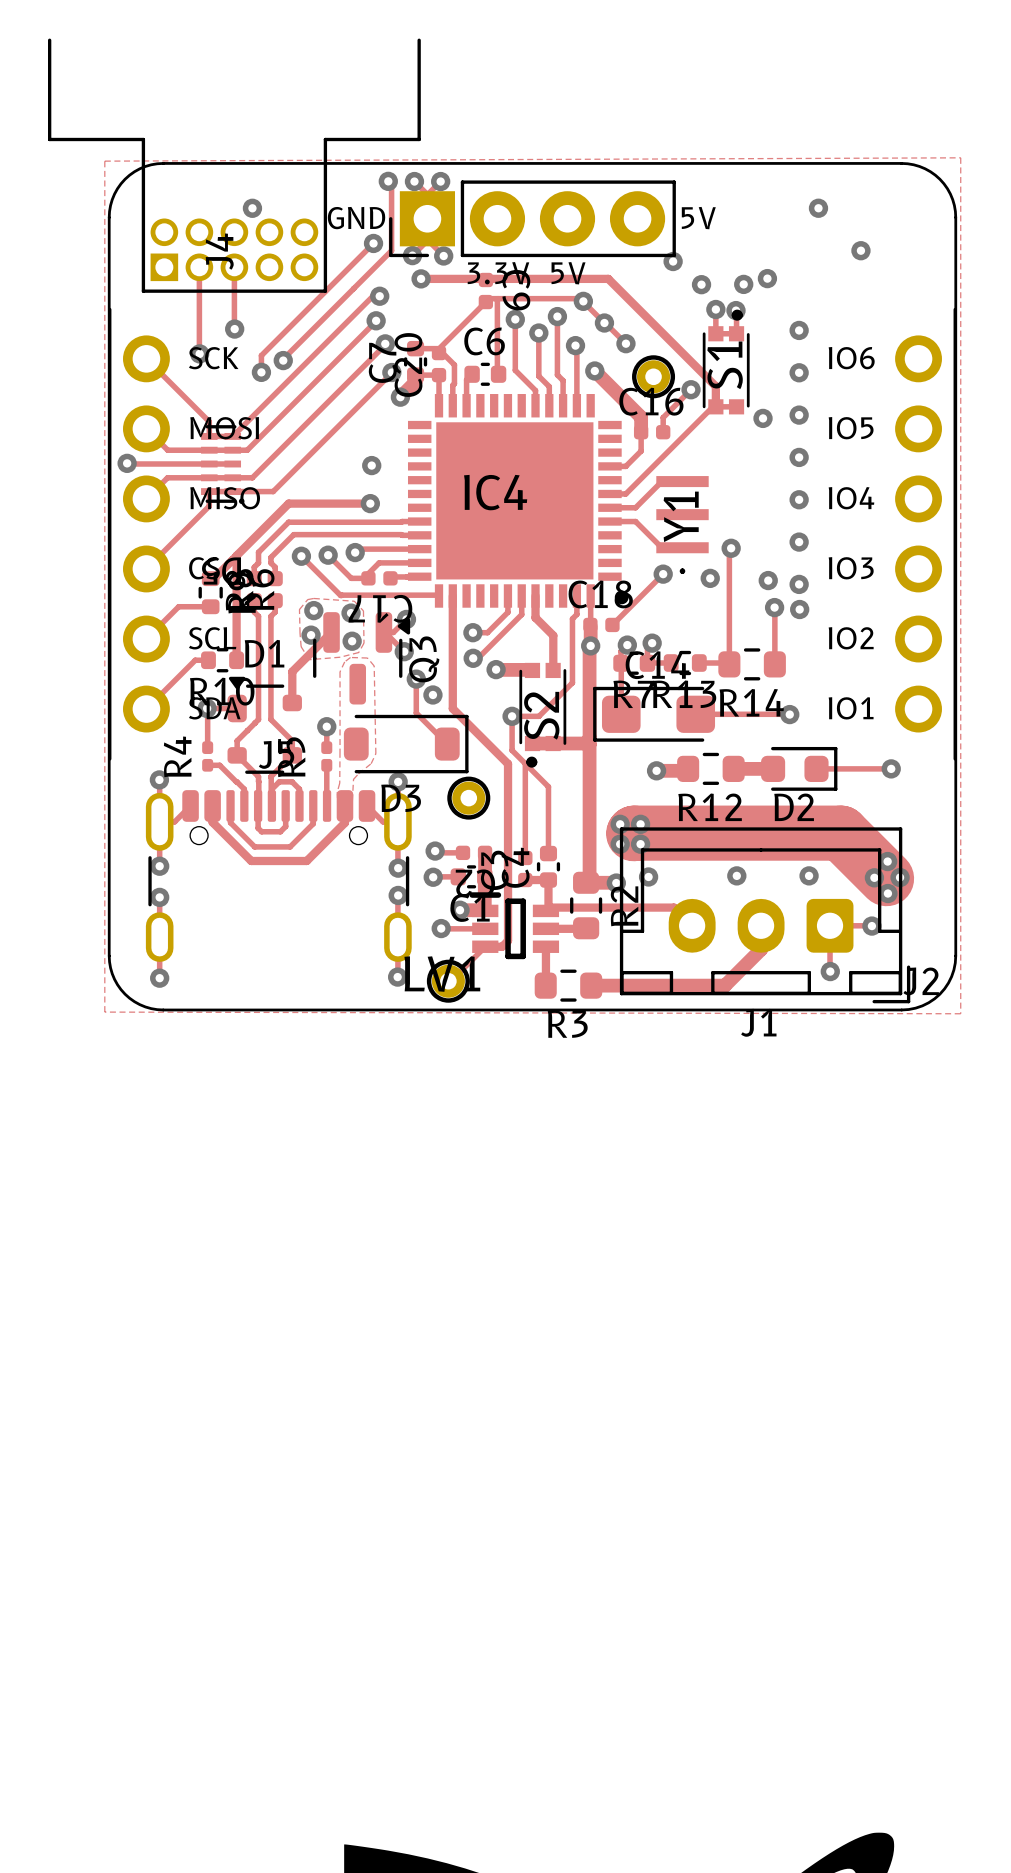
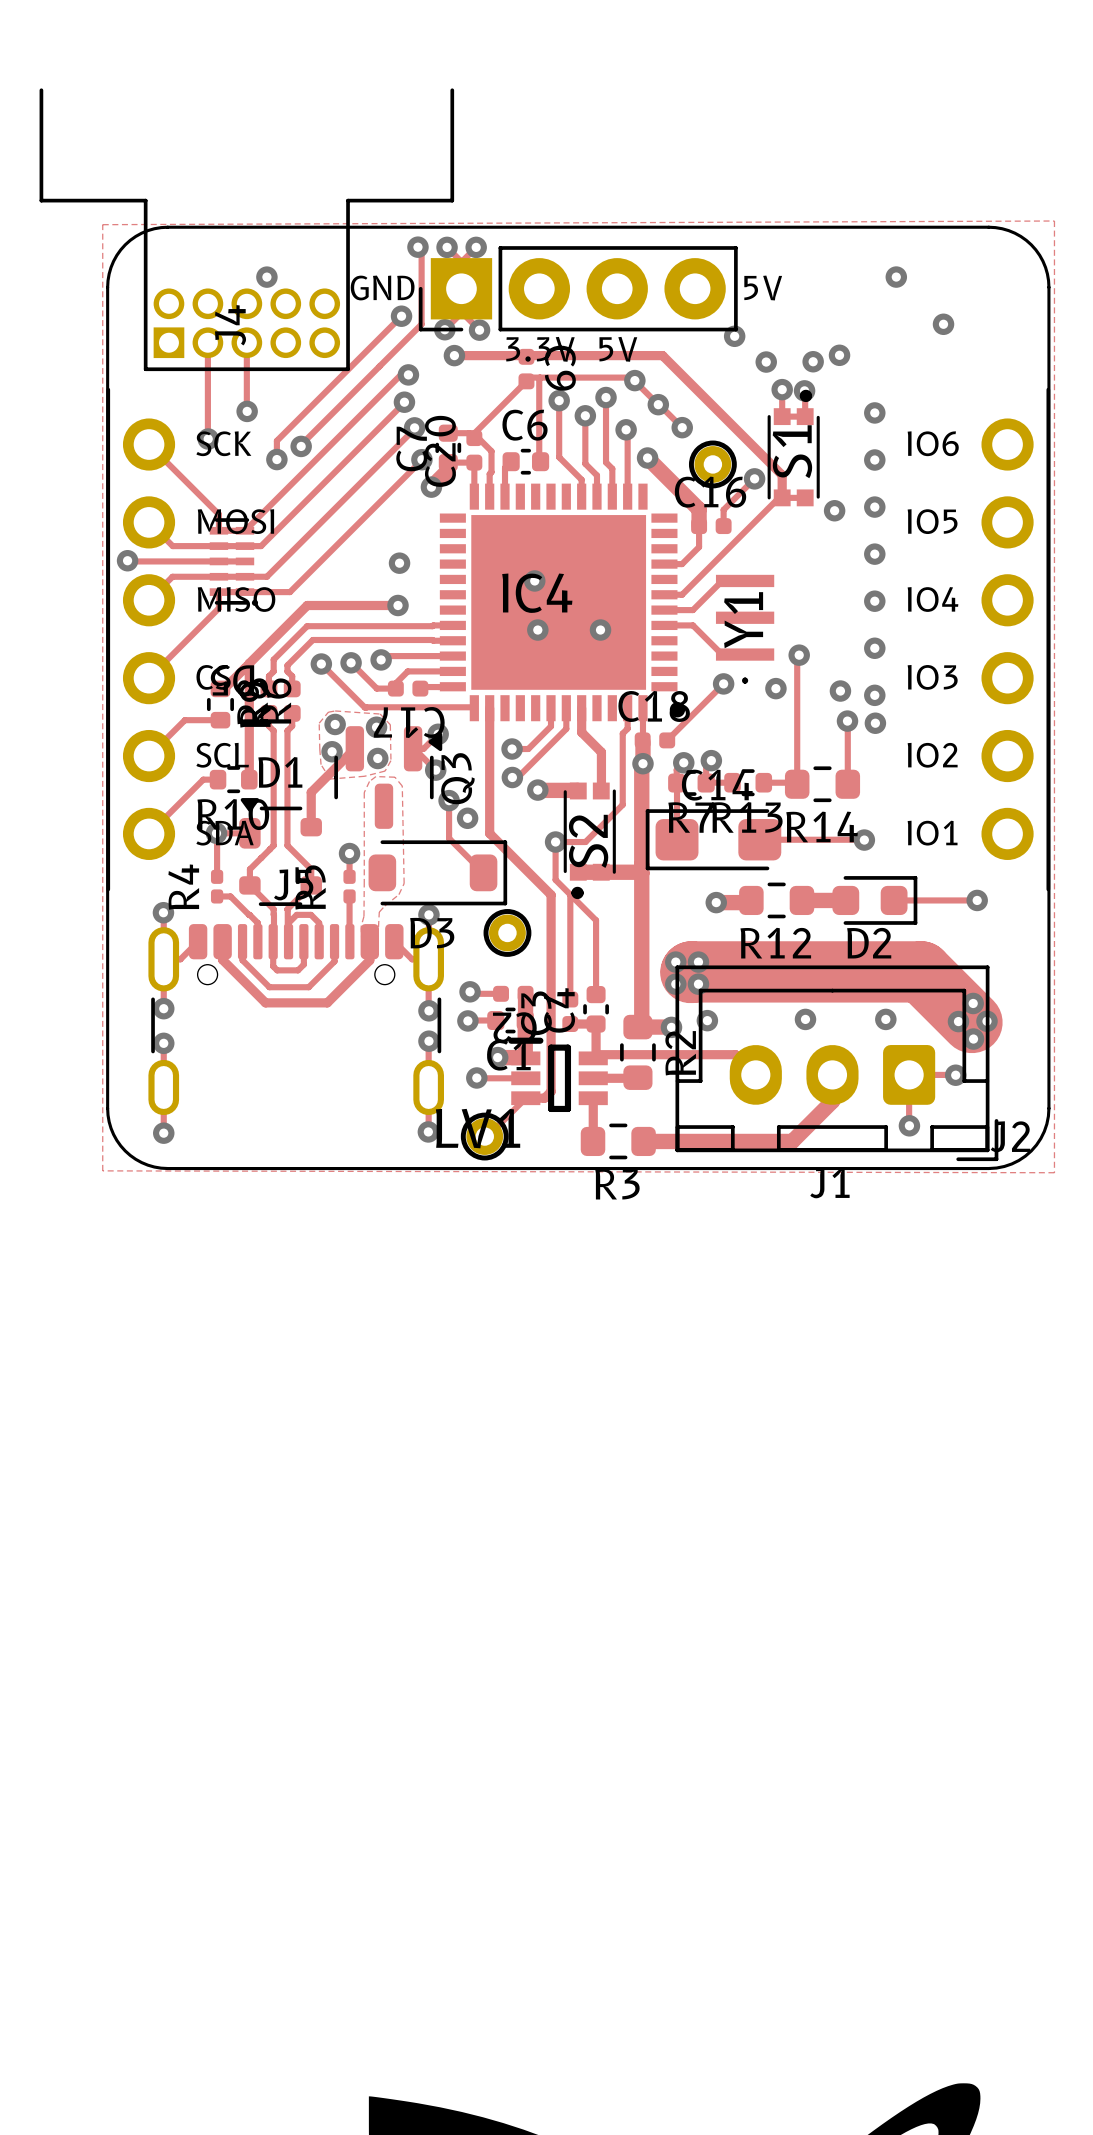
via: none -> (534, 580)
via: none -> (537, 630)
via: none -> (600, 630)

